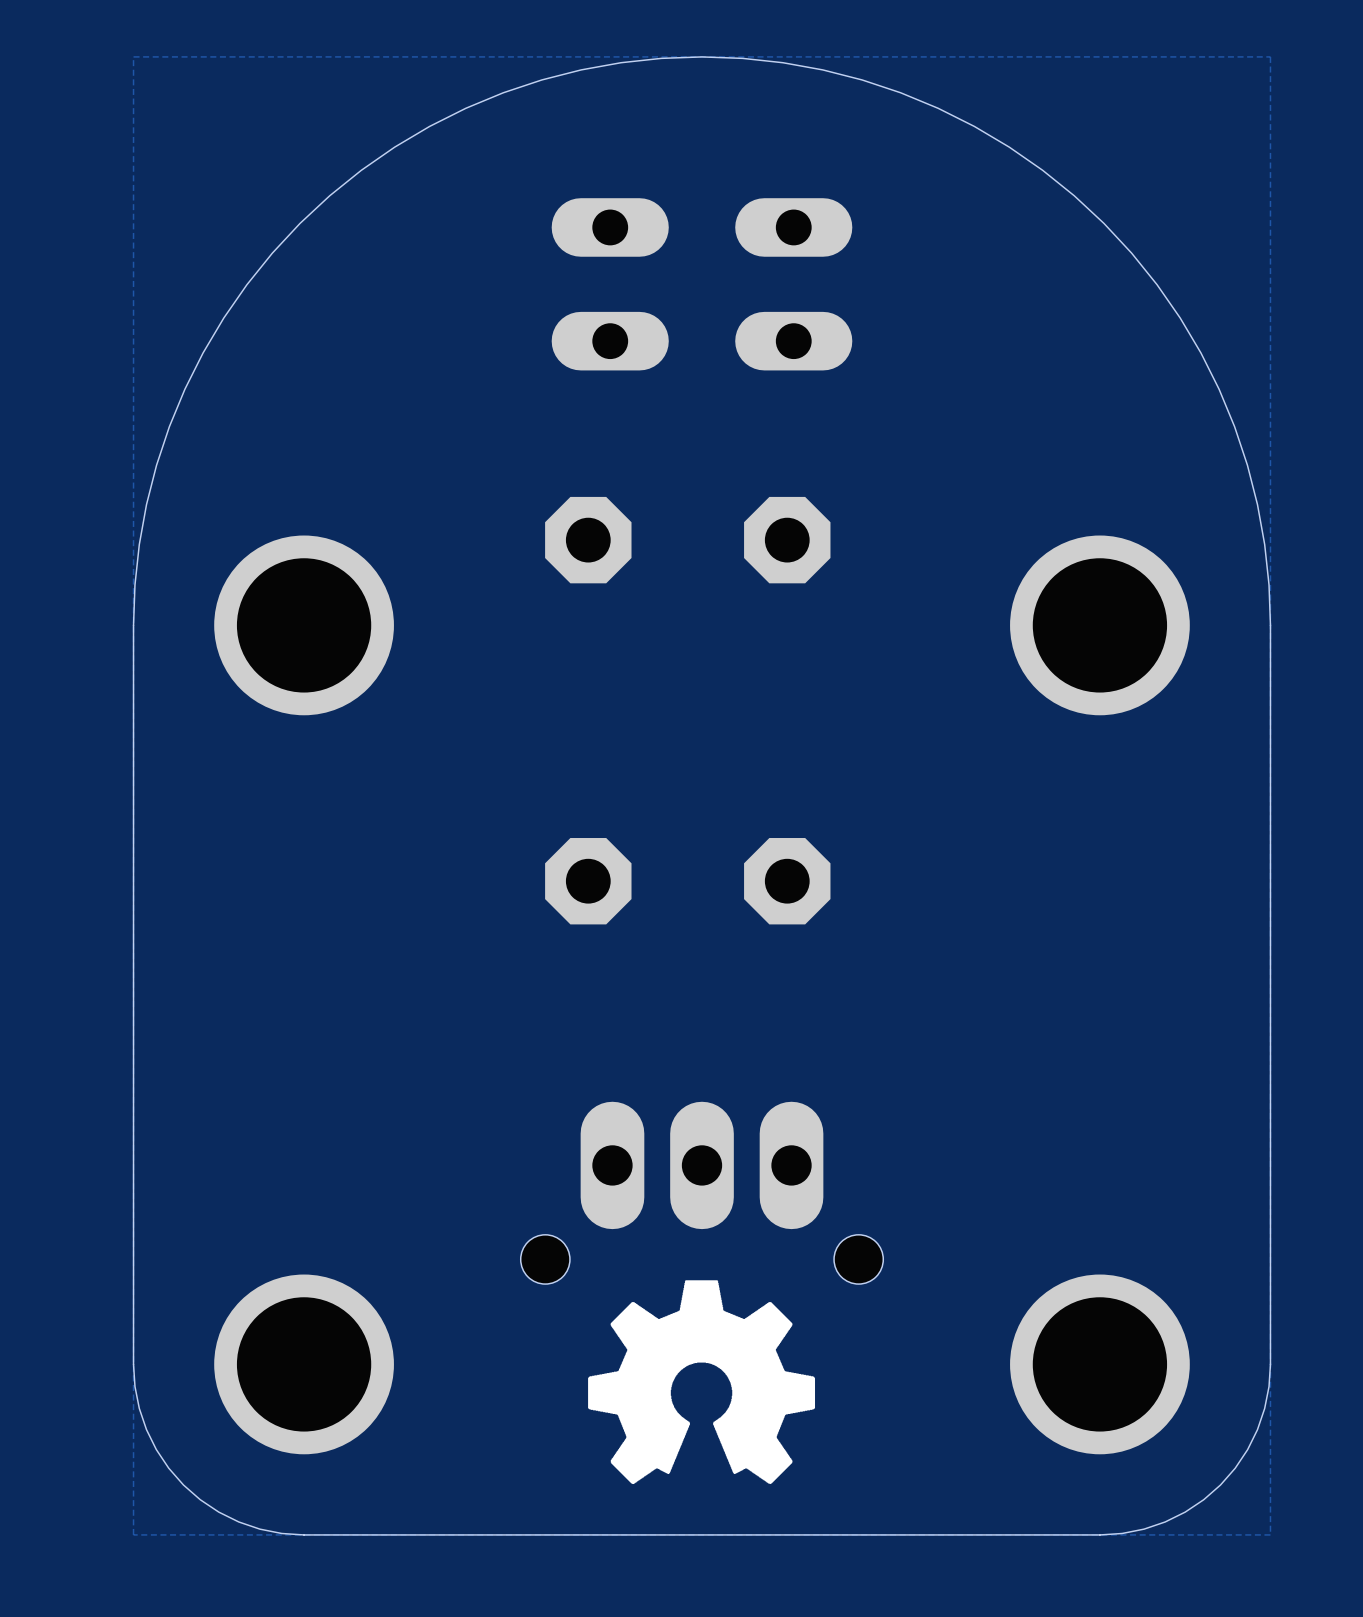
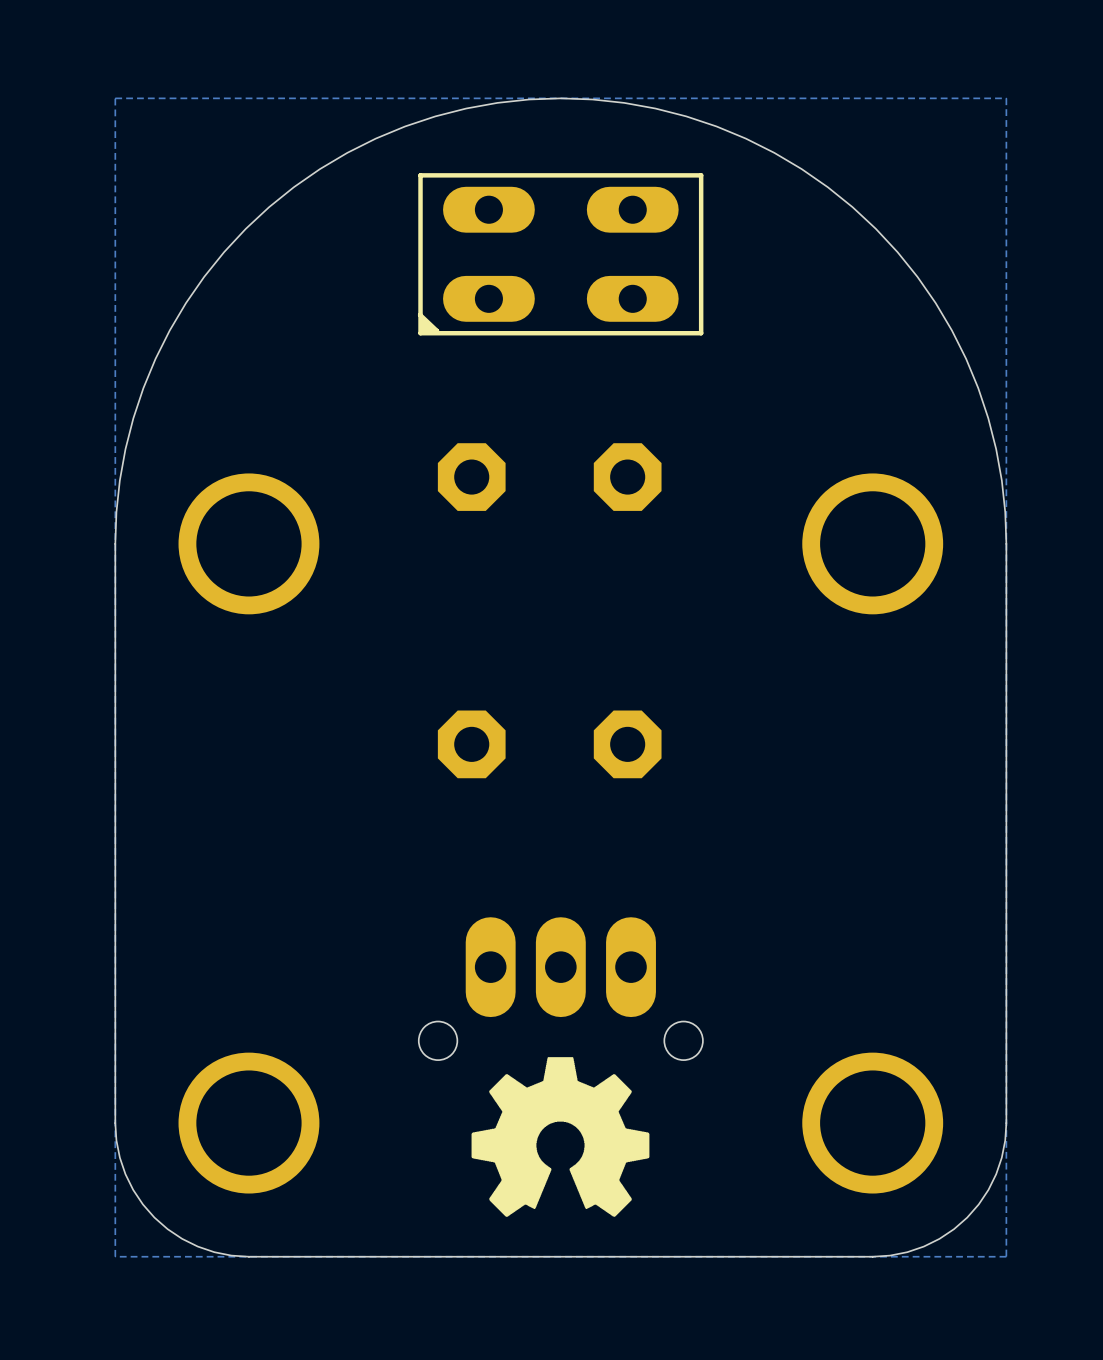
part footprint: [551, 198, 853, 371] -> [417, 173, 704, 336]

